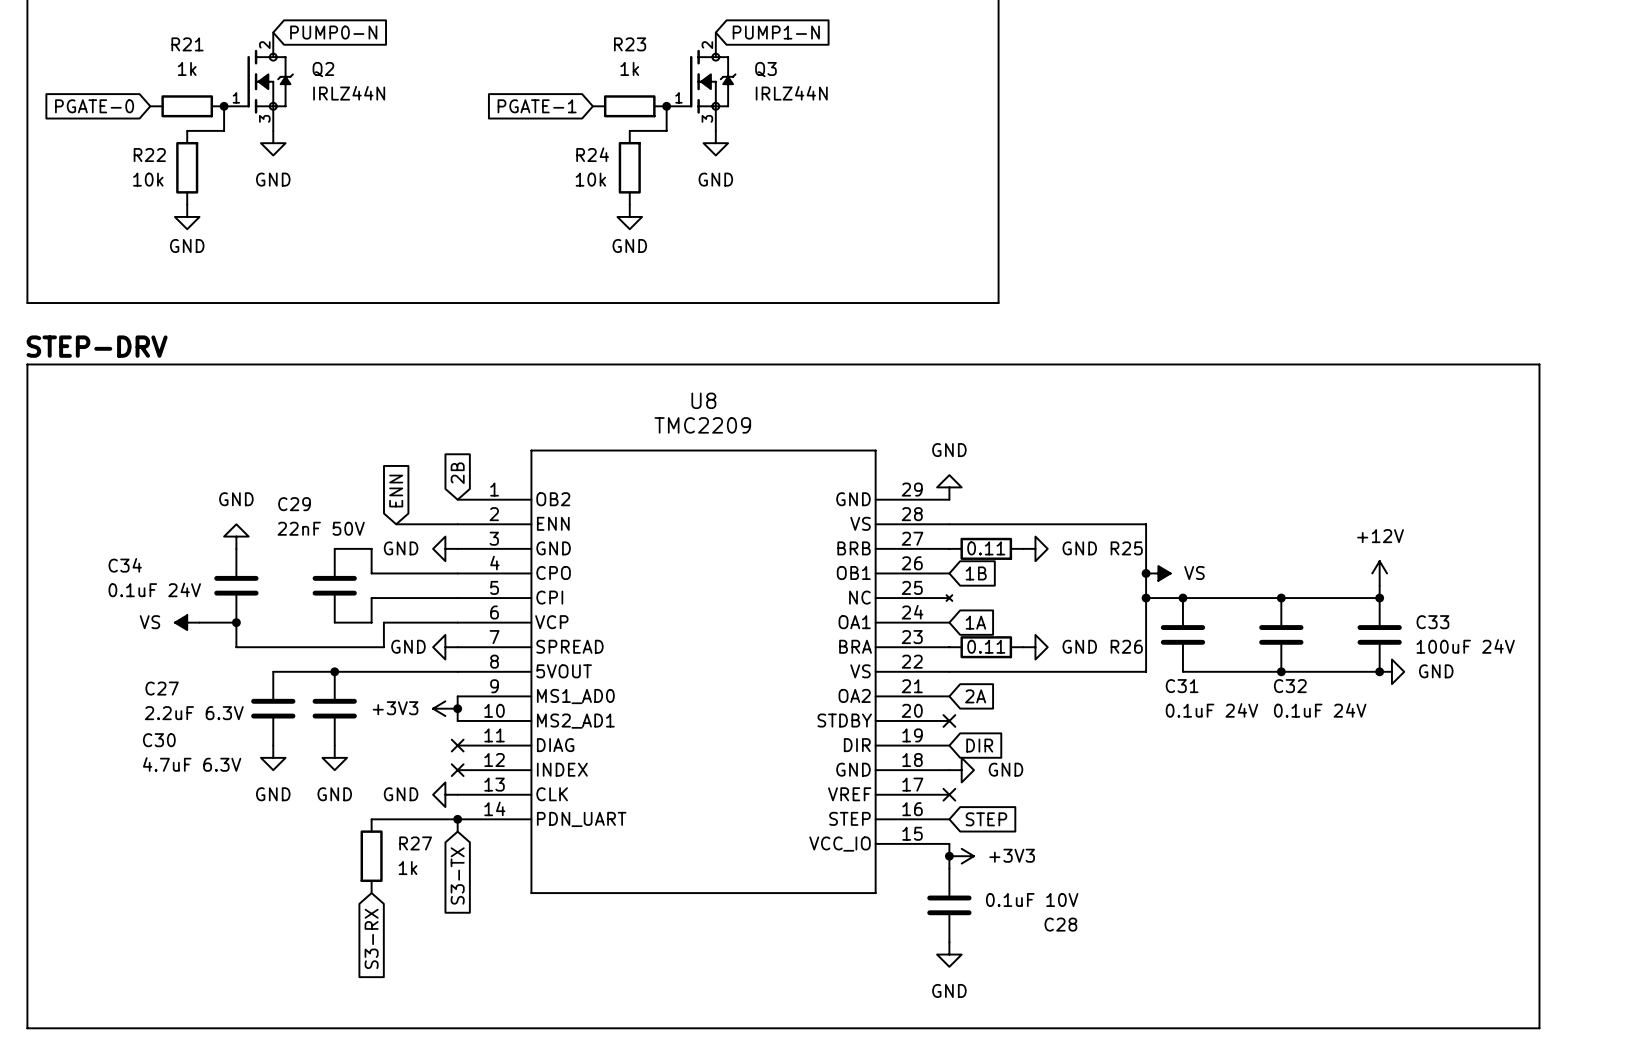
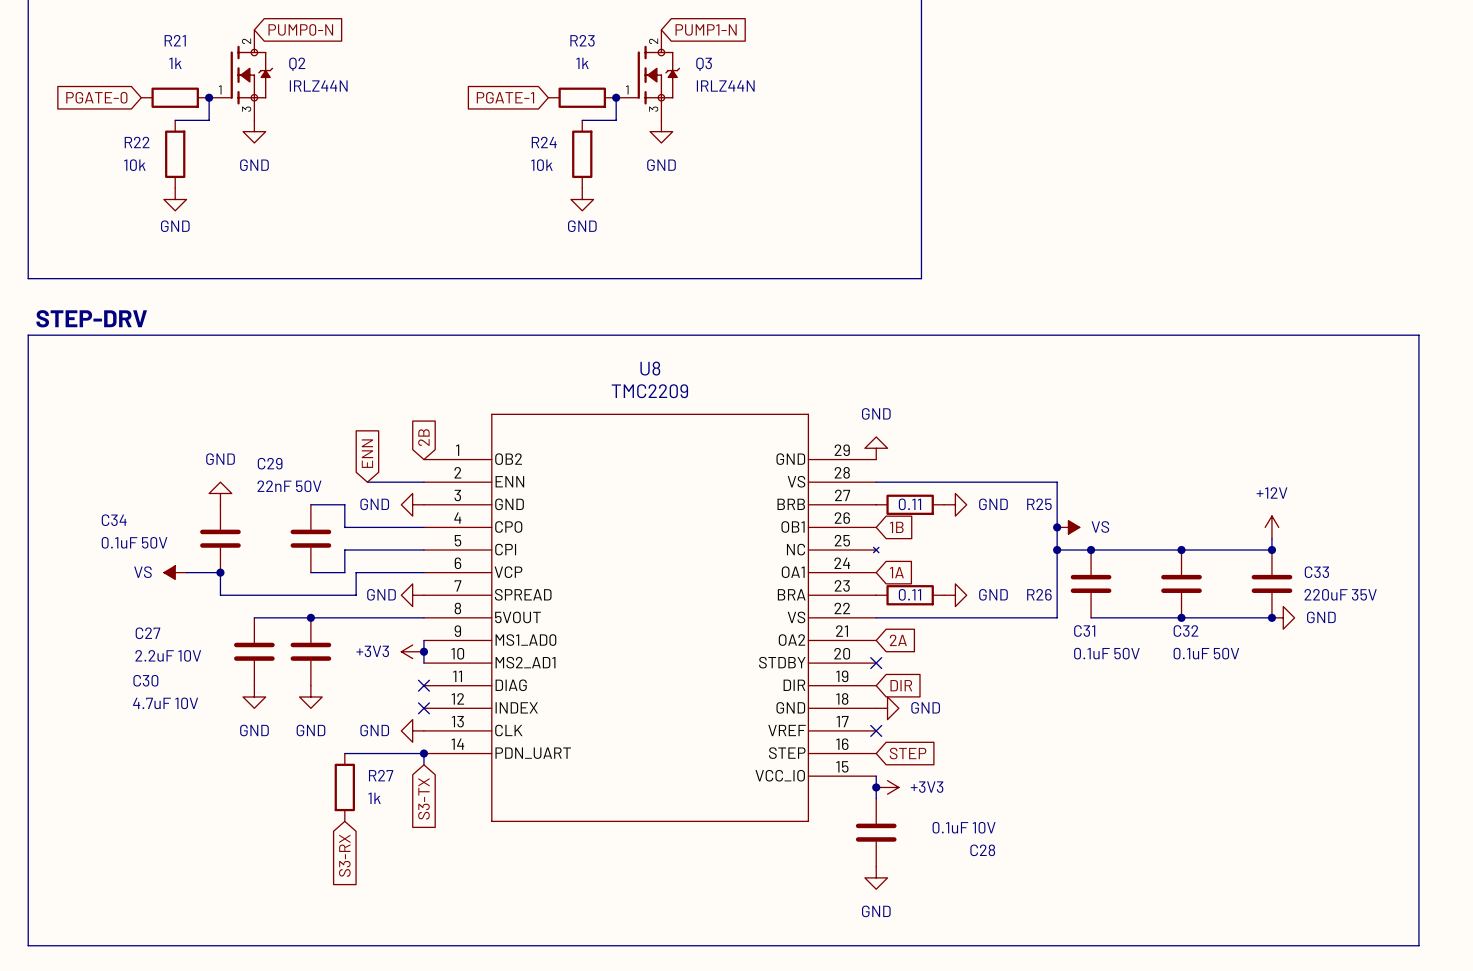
C34 value: 0.1uF 24V (154, 589) -> 0.1uF 50V (134, 542)
C33 value: 100uF 24V (1465, 646) -> 220uF 35V (1340, 594)
C31 value: 0.1uF 24V (1211, 710) -> 0.1uF 50V (1106, 653)
C32 value: 0.1uF 24V (1320, 710) -> 0.1uF 50V (1206, 653)
C27 value: 2.2uF 6.3V (194, 713) -> 2.2uF 10V (168, 655)
C30 value: 4.7uF 6.3V (192, 764) -> 4.7uF 10V (165, 703)

